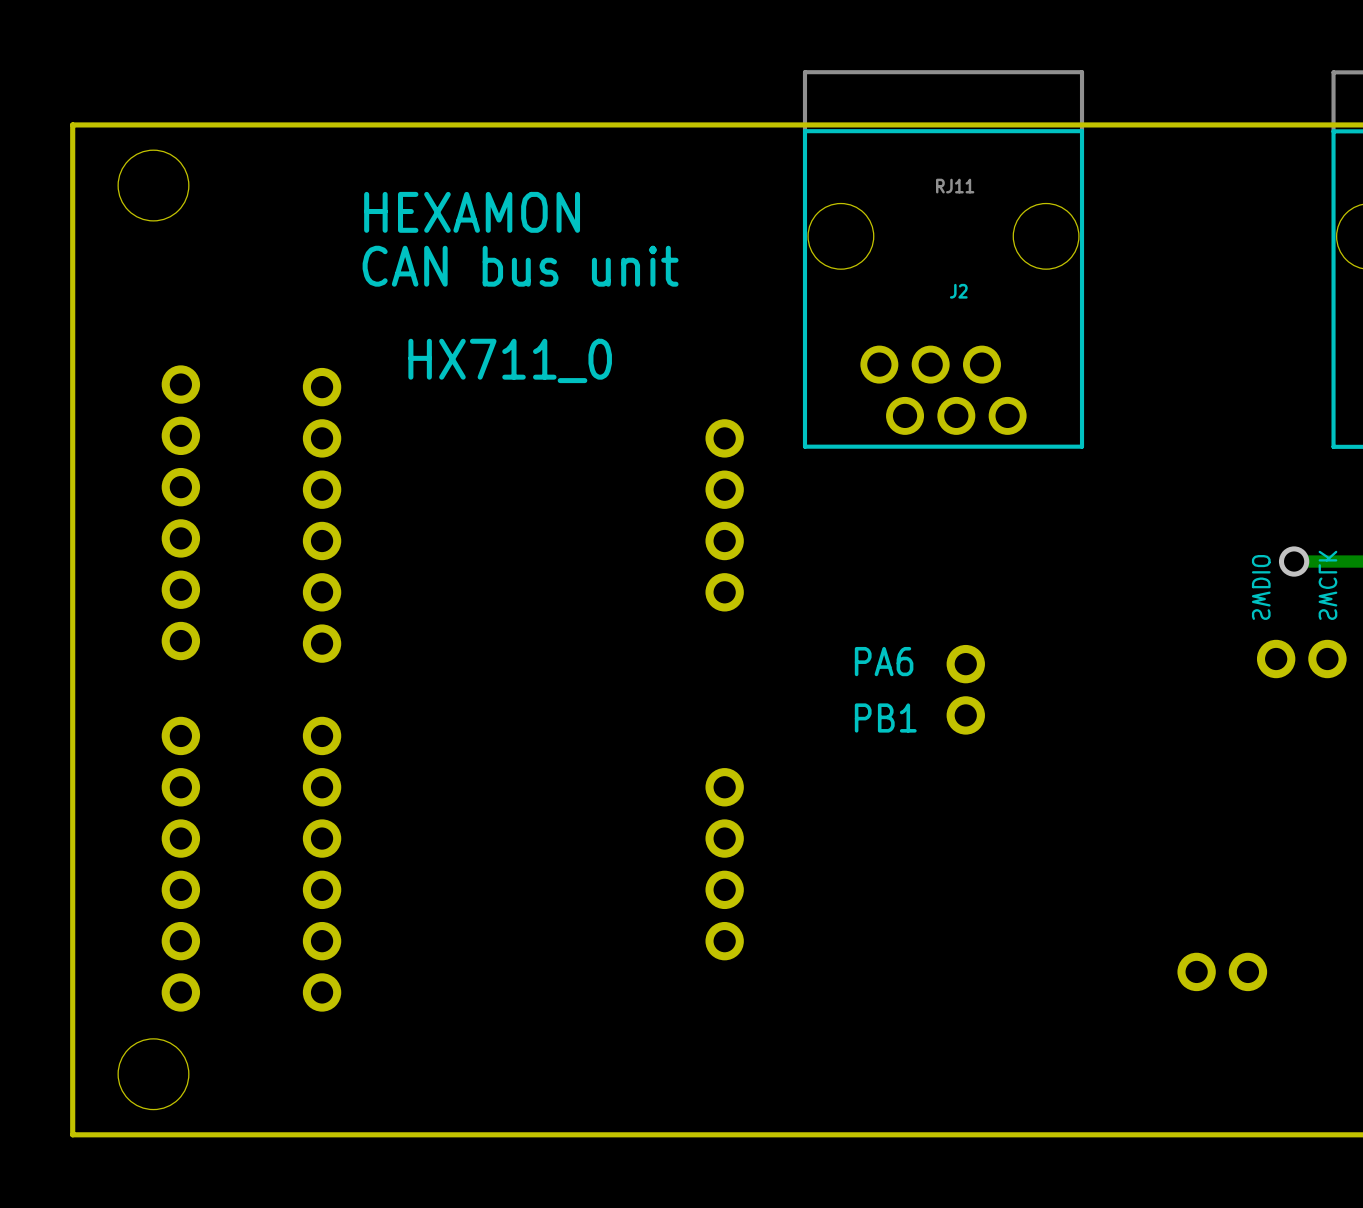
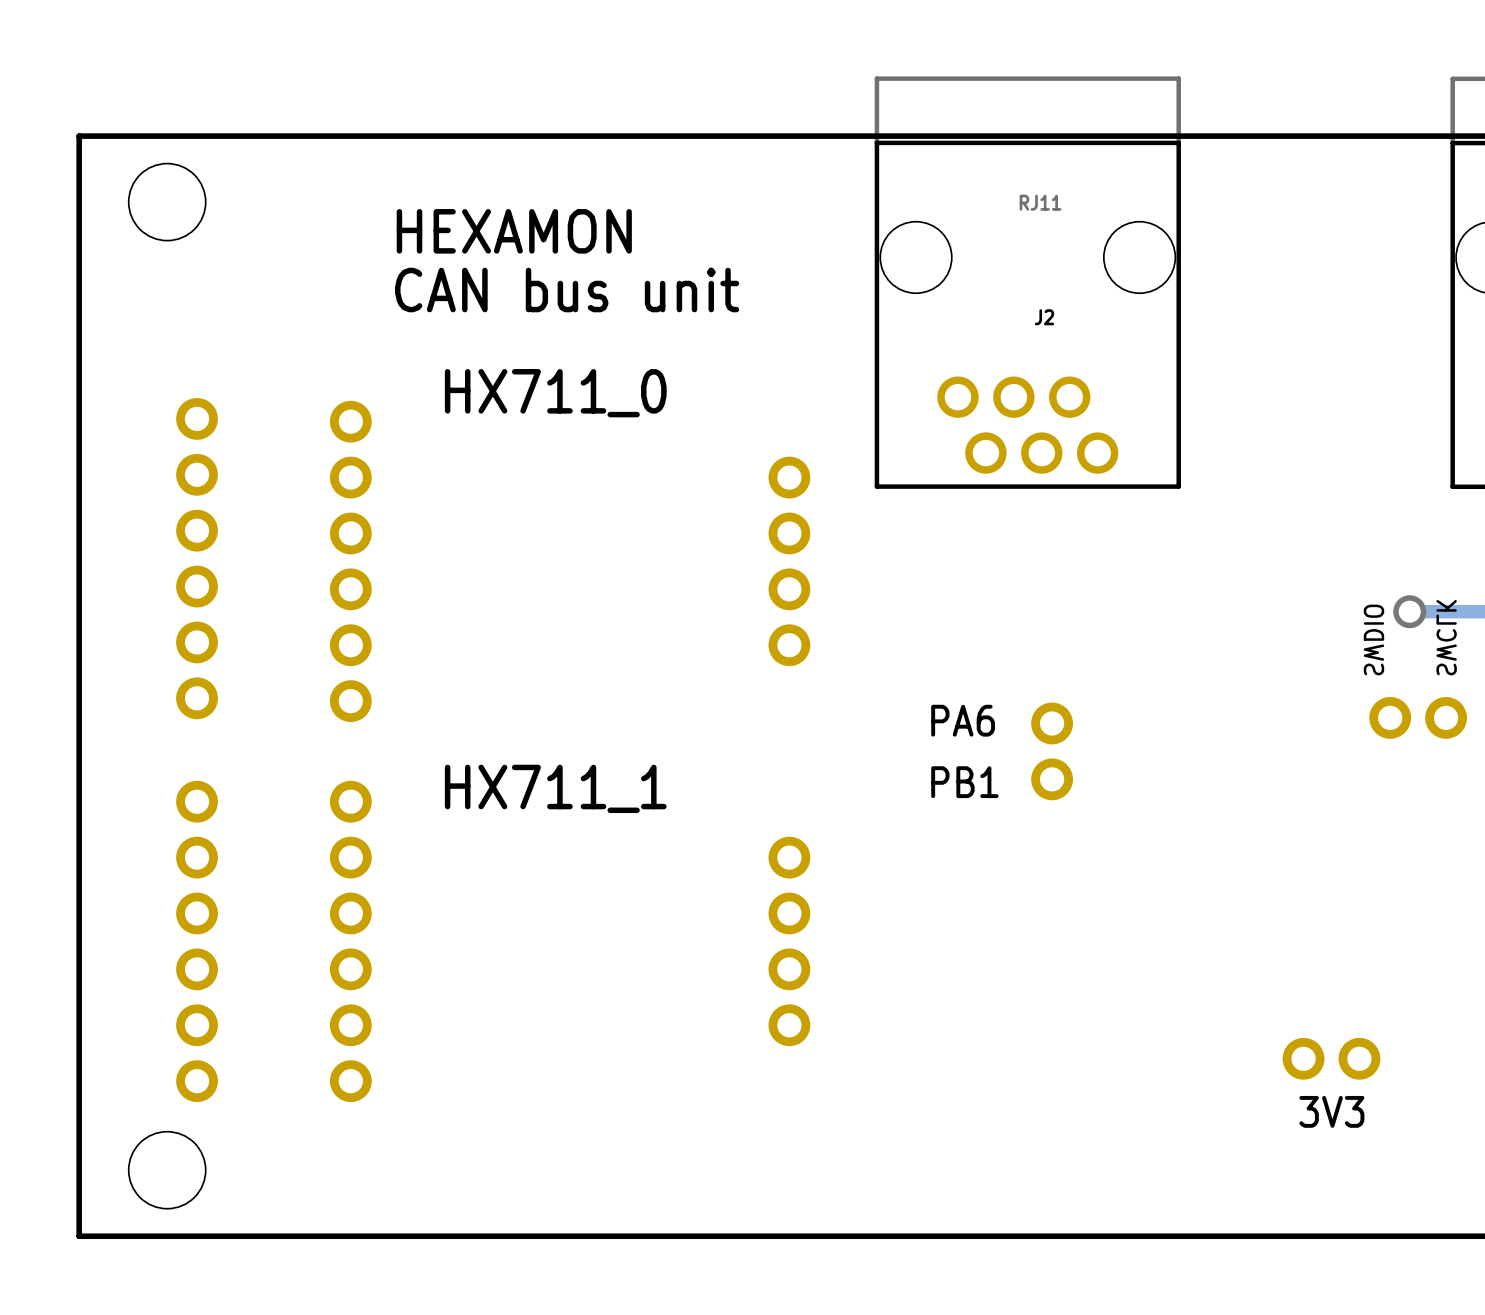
text: none -> HX711_1 (555, 788)
text: none -> 3V3 (1331, 1111)

